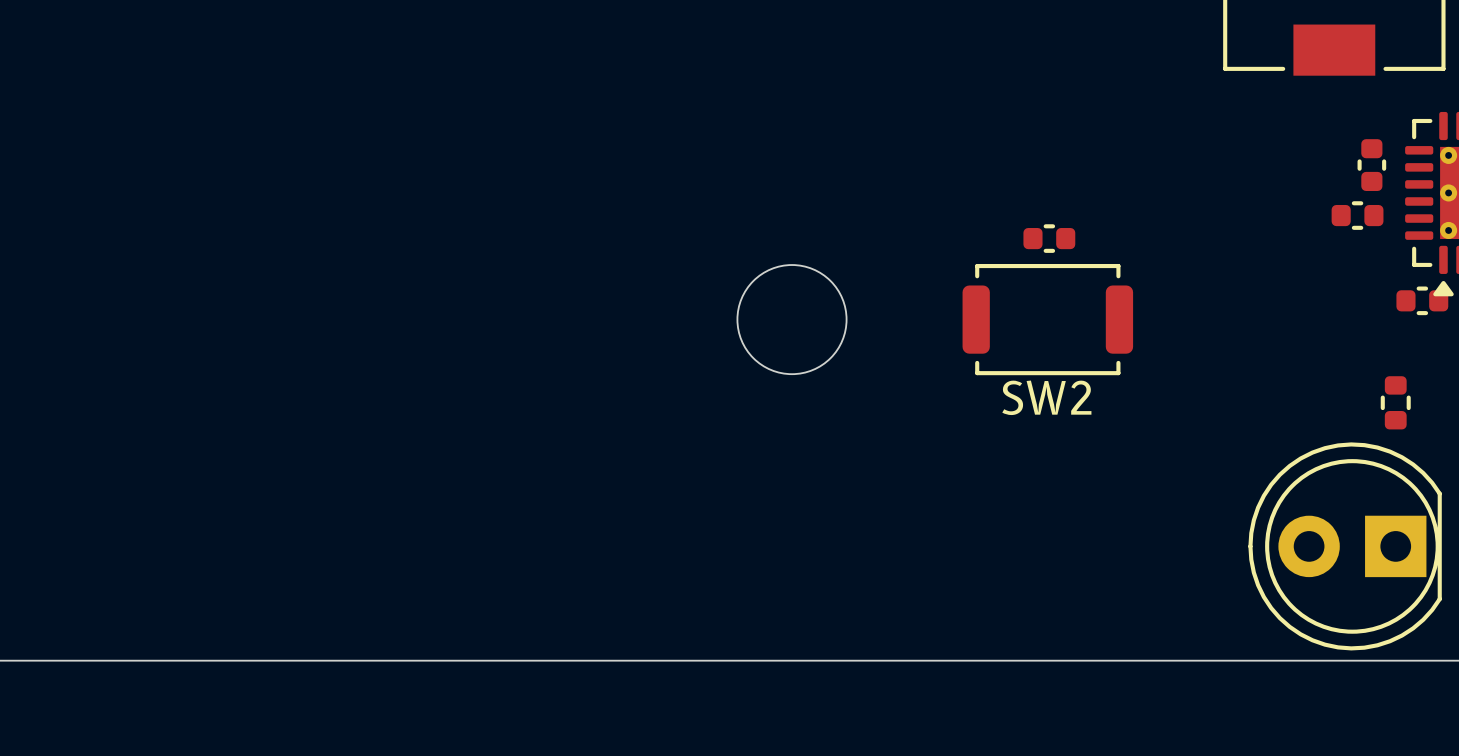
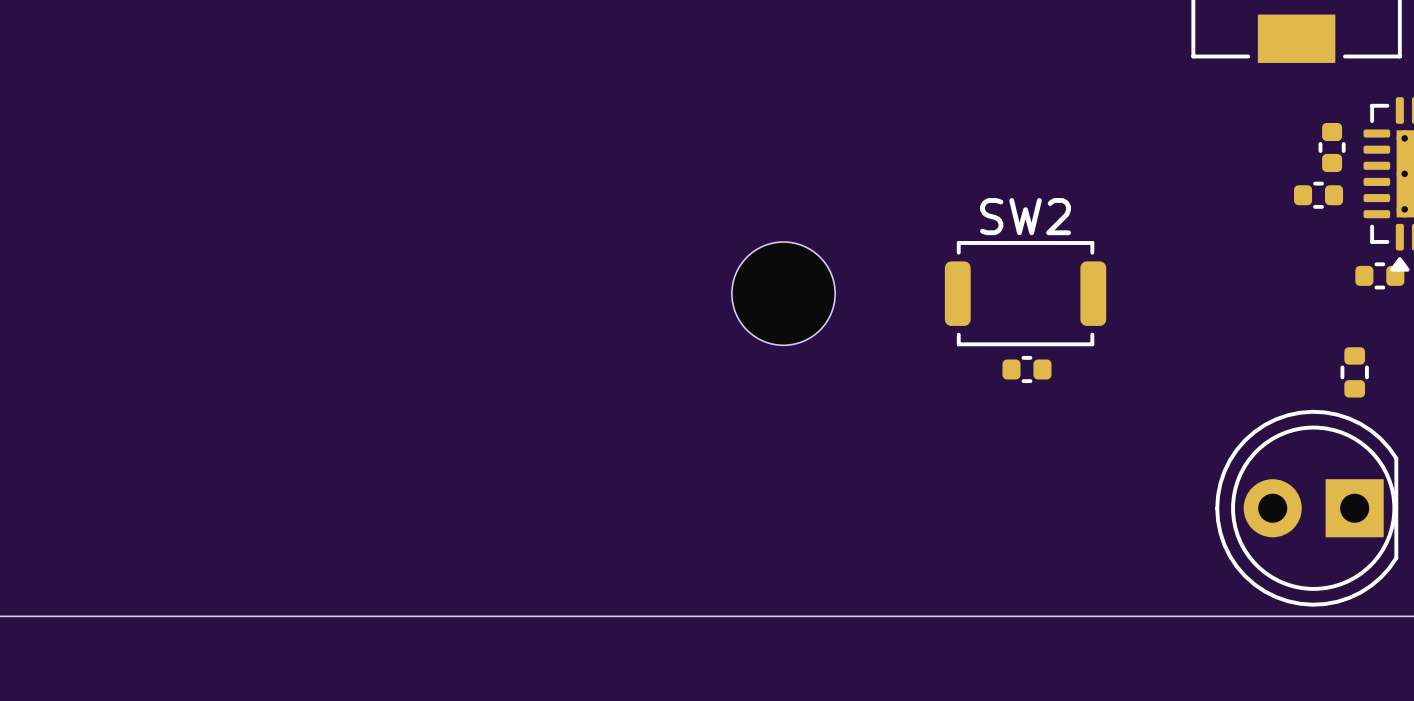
part position: (1049, 238) -> (1026, 369)
SW2 name position: SW2 (1046, 397) -> SW2 (1025, 216)

